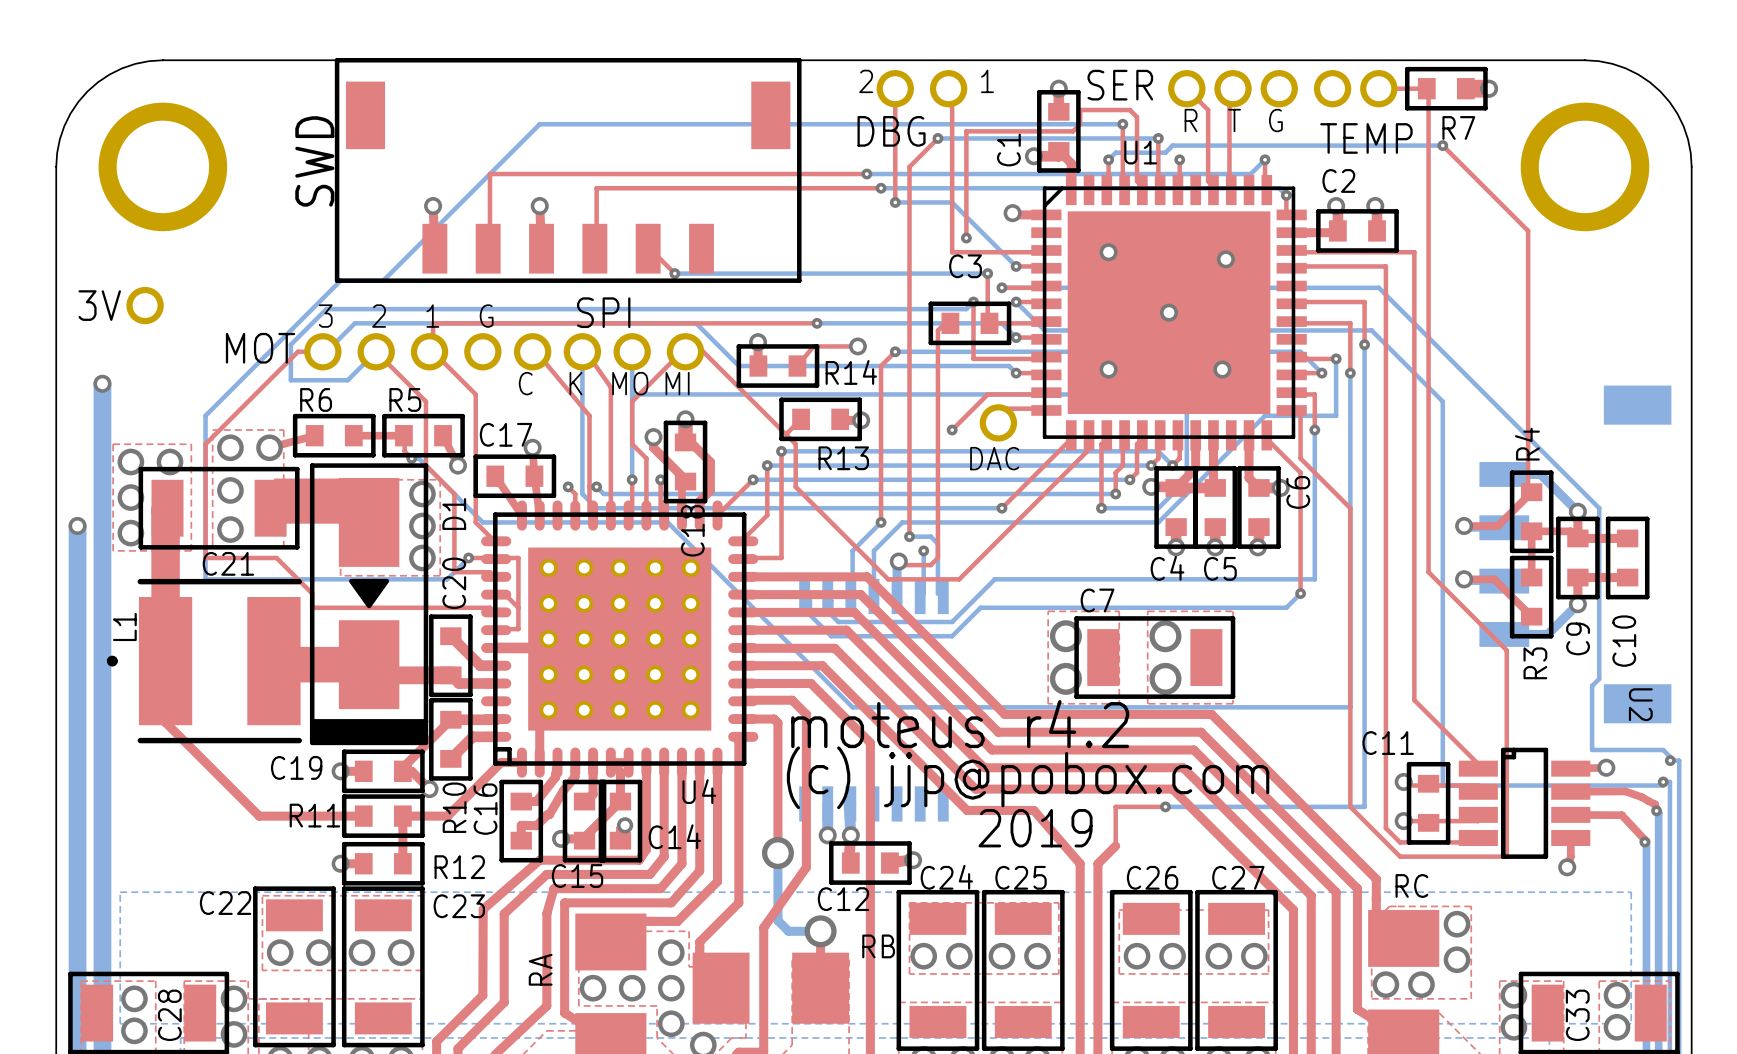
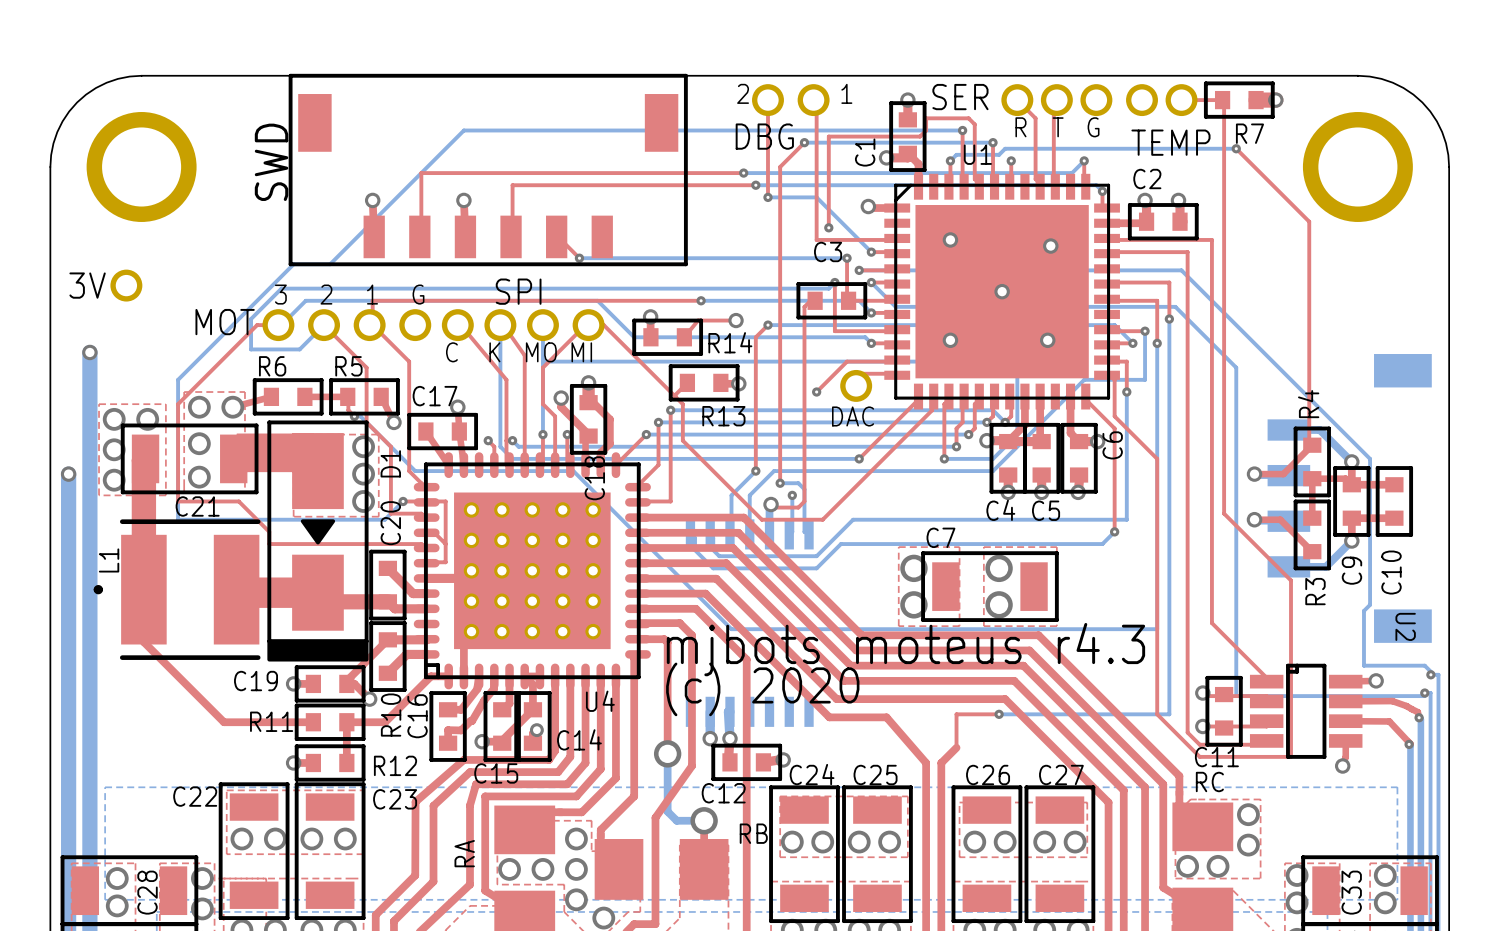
text: moteus r4.2 (960, 724) -> mjbots moteus r4.3 (905, 649)
C11 name position: C11 (1388, 743) -> C11 (1216, 757)
text: (c) jjp@pobox.com (1028, 777) -> (c) 2020 (762, 689)
text: 2019 (1035, 828) -> none

